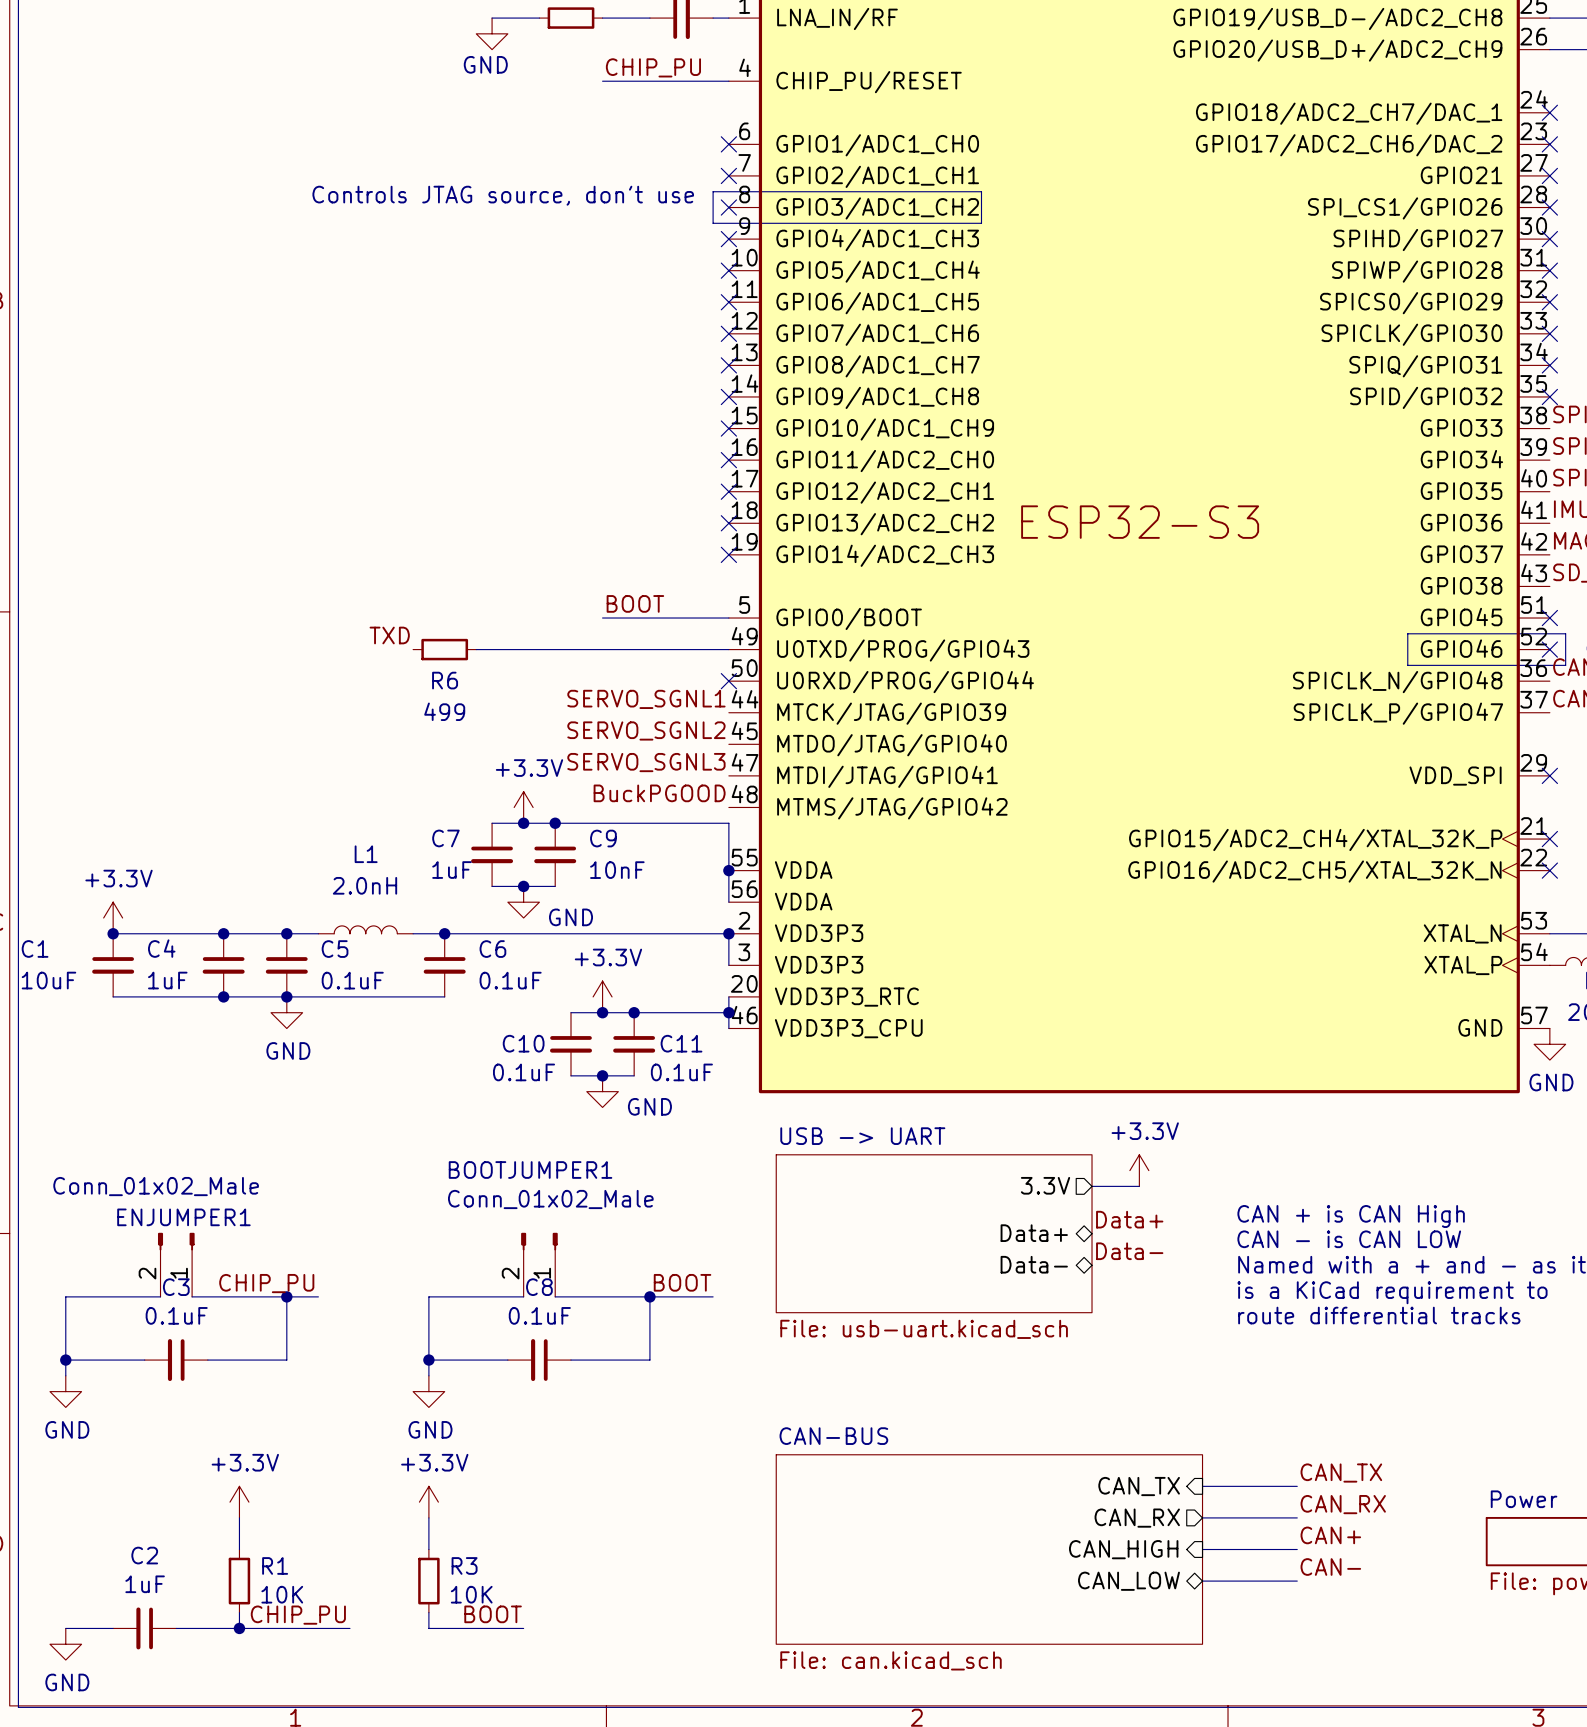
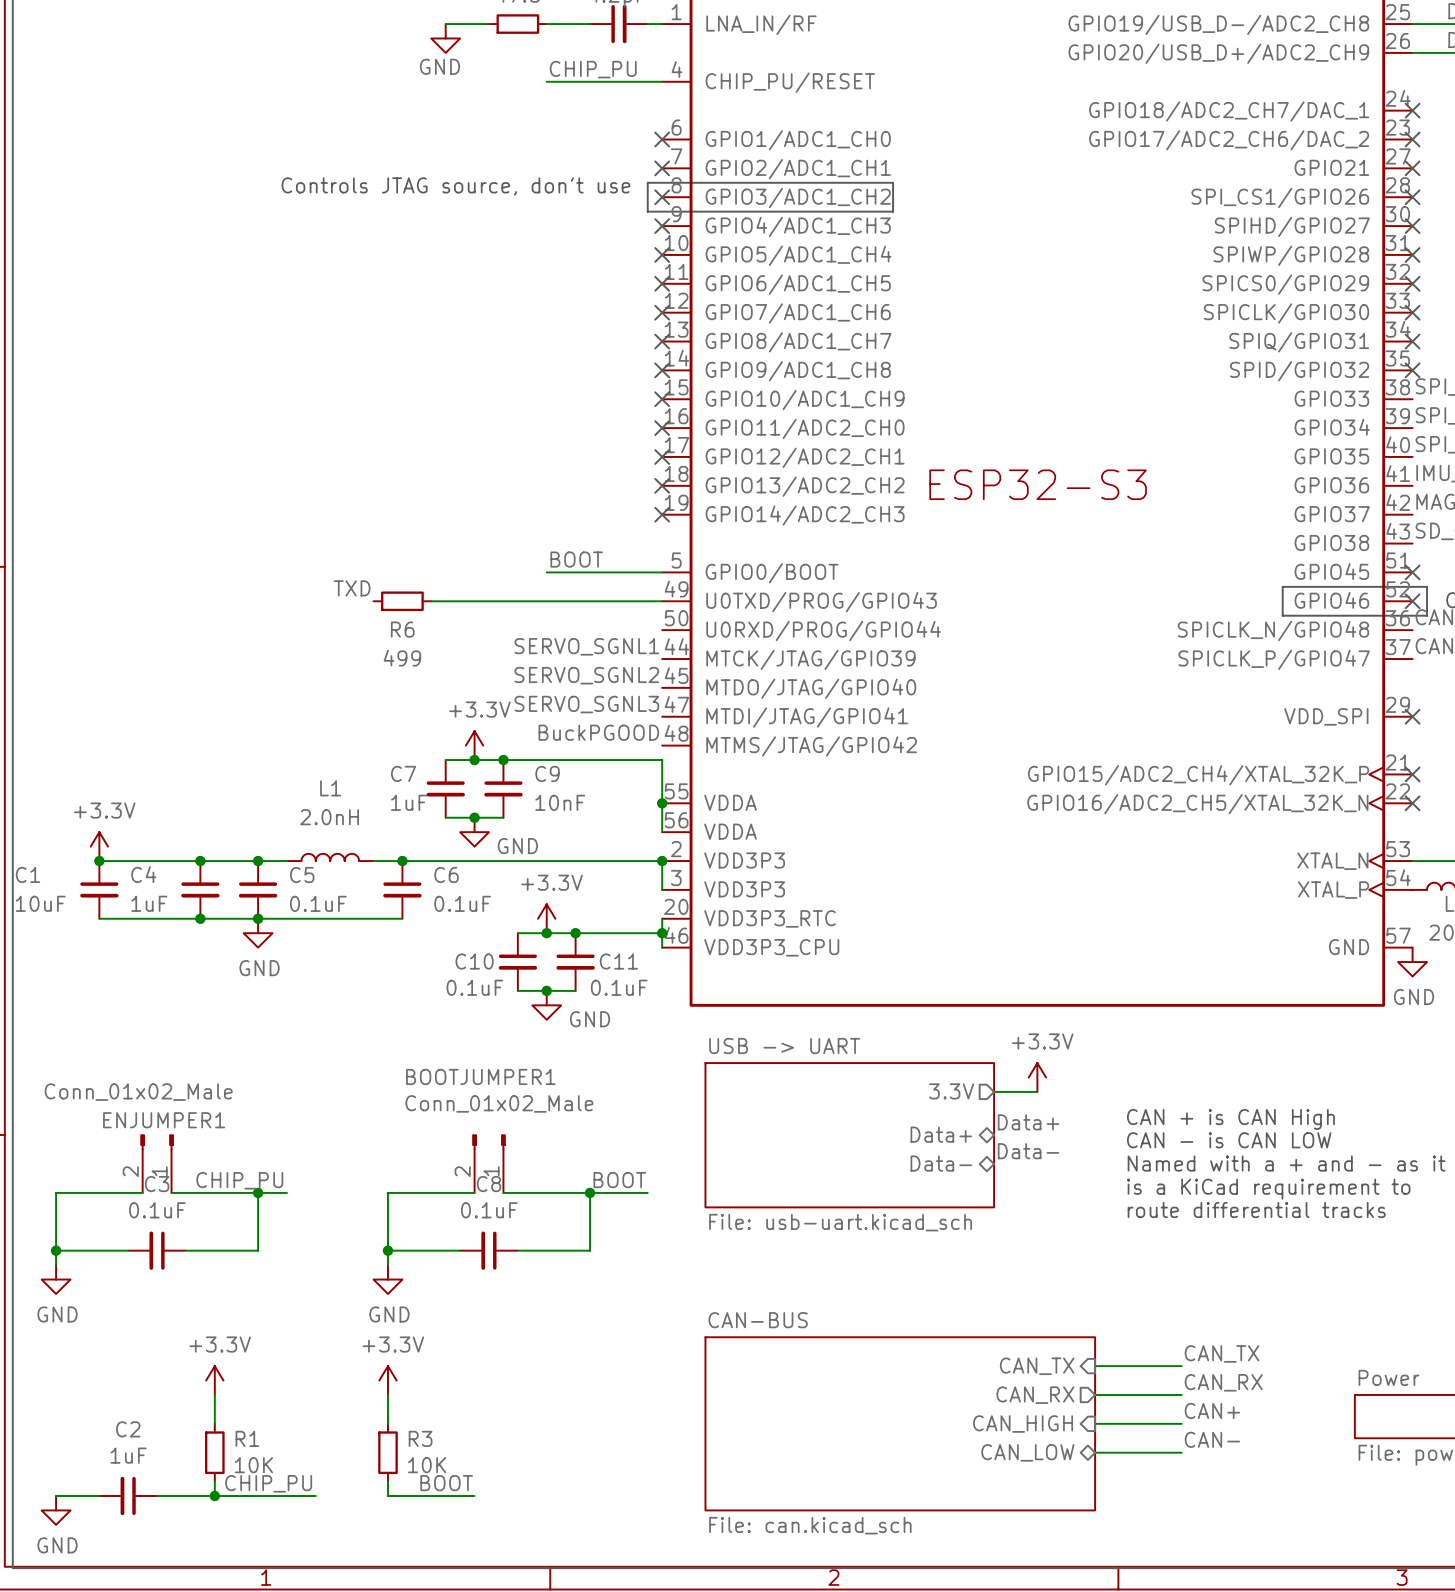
no-connect mark: (728, 681) -> none

